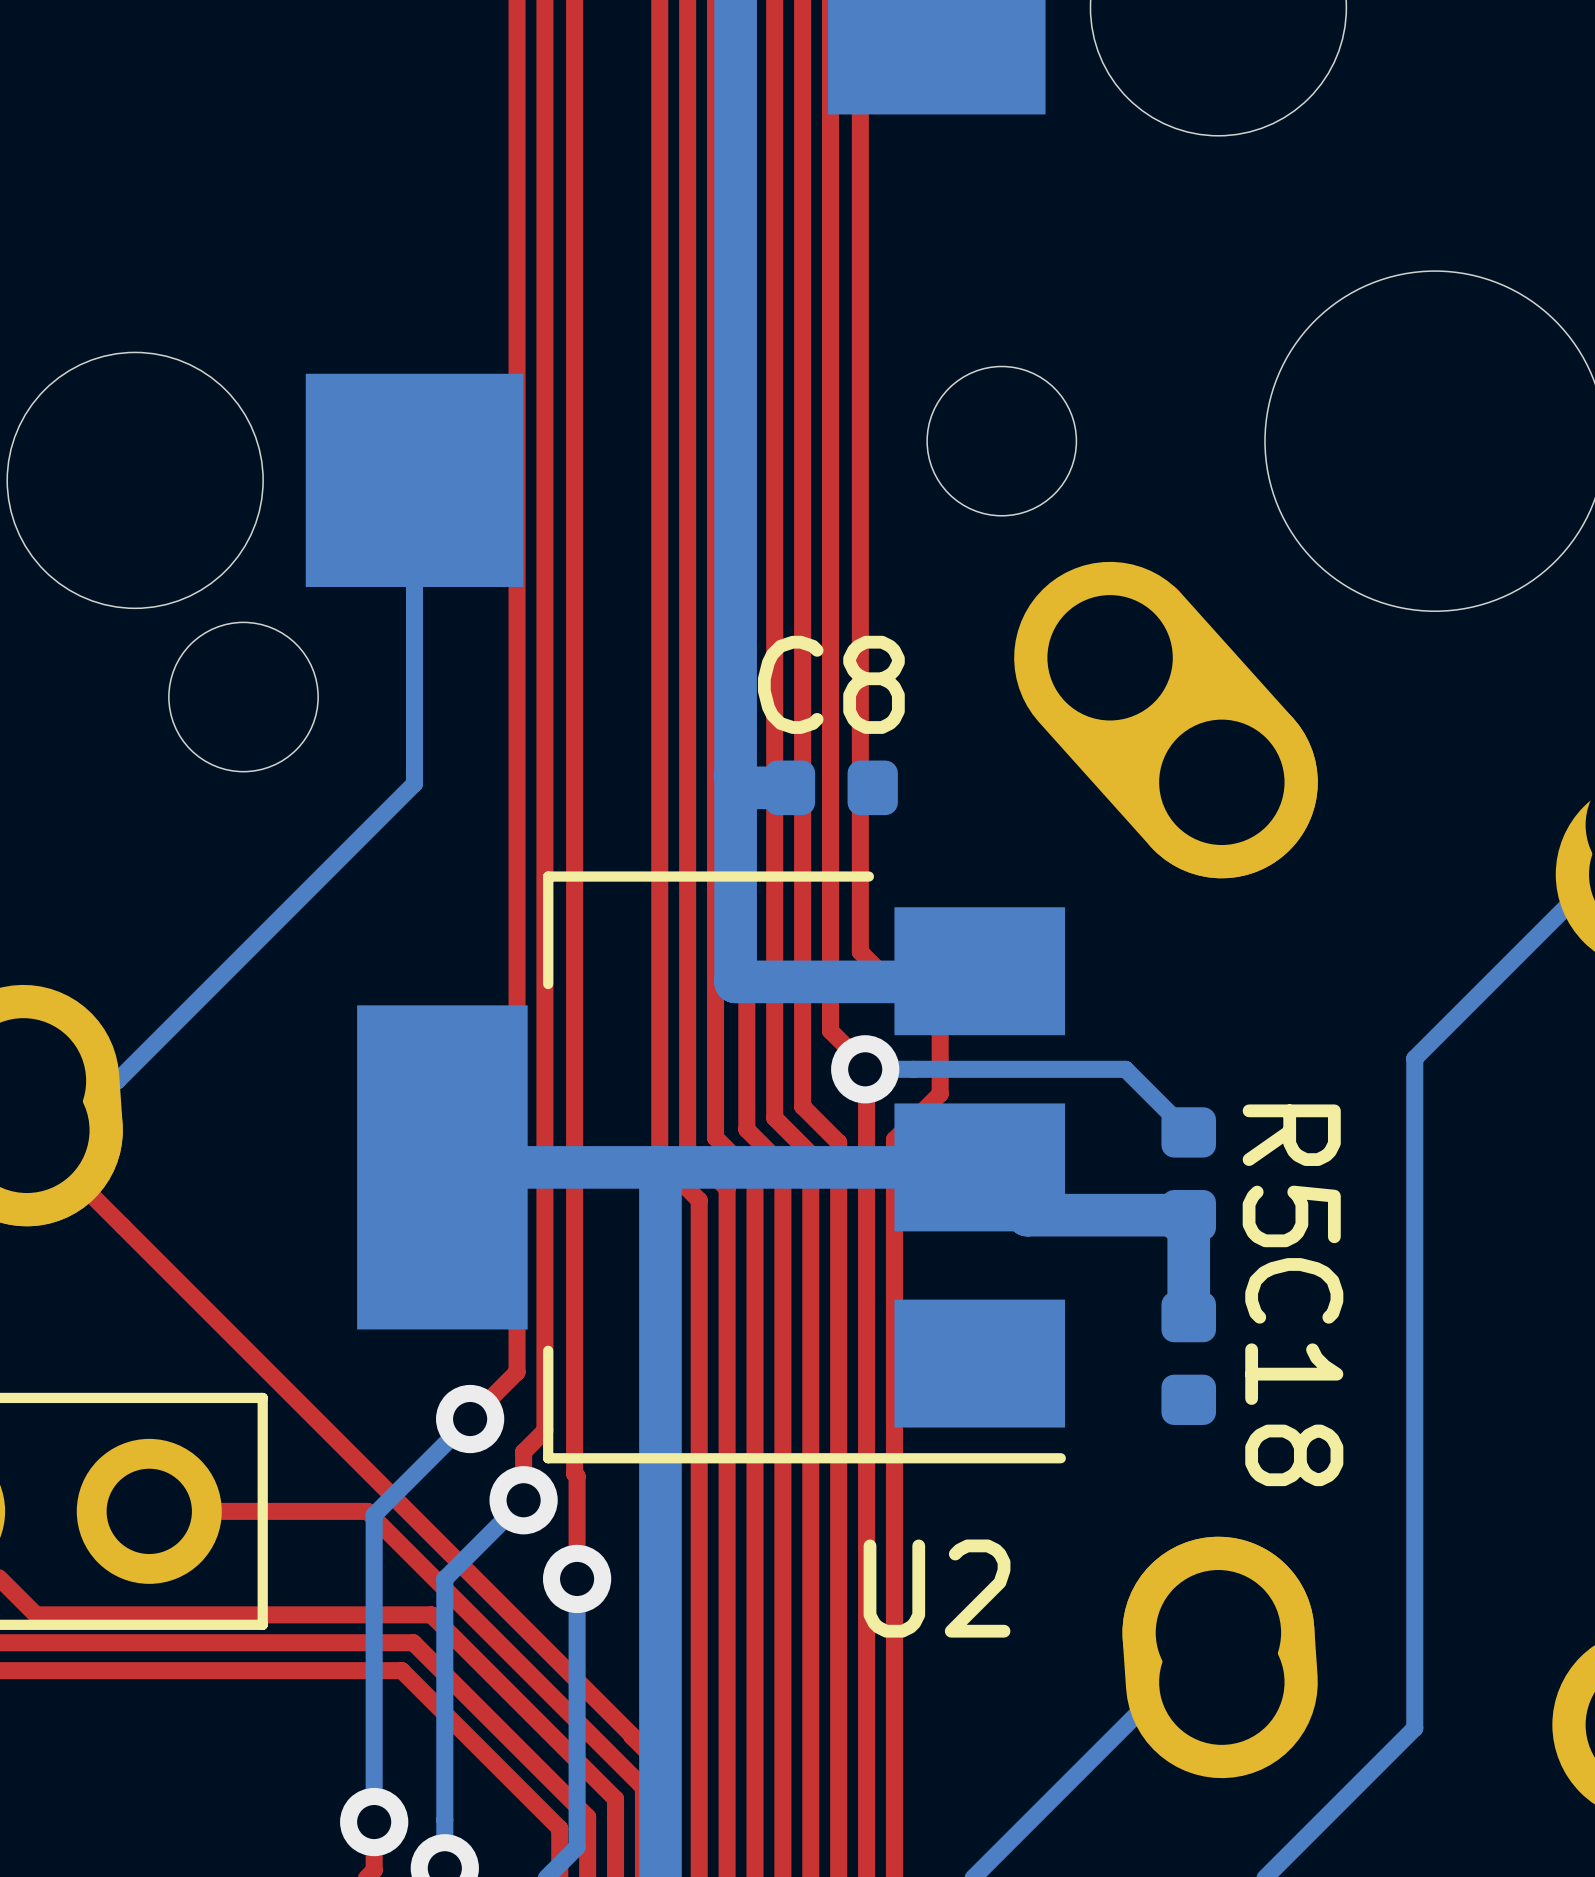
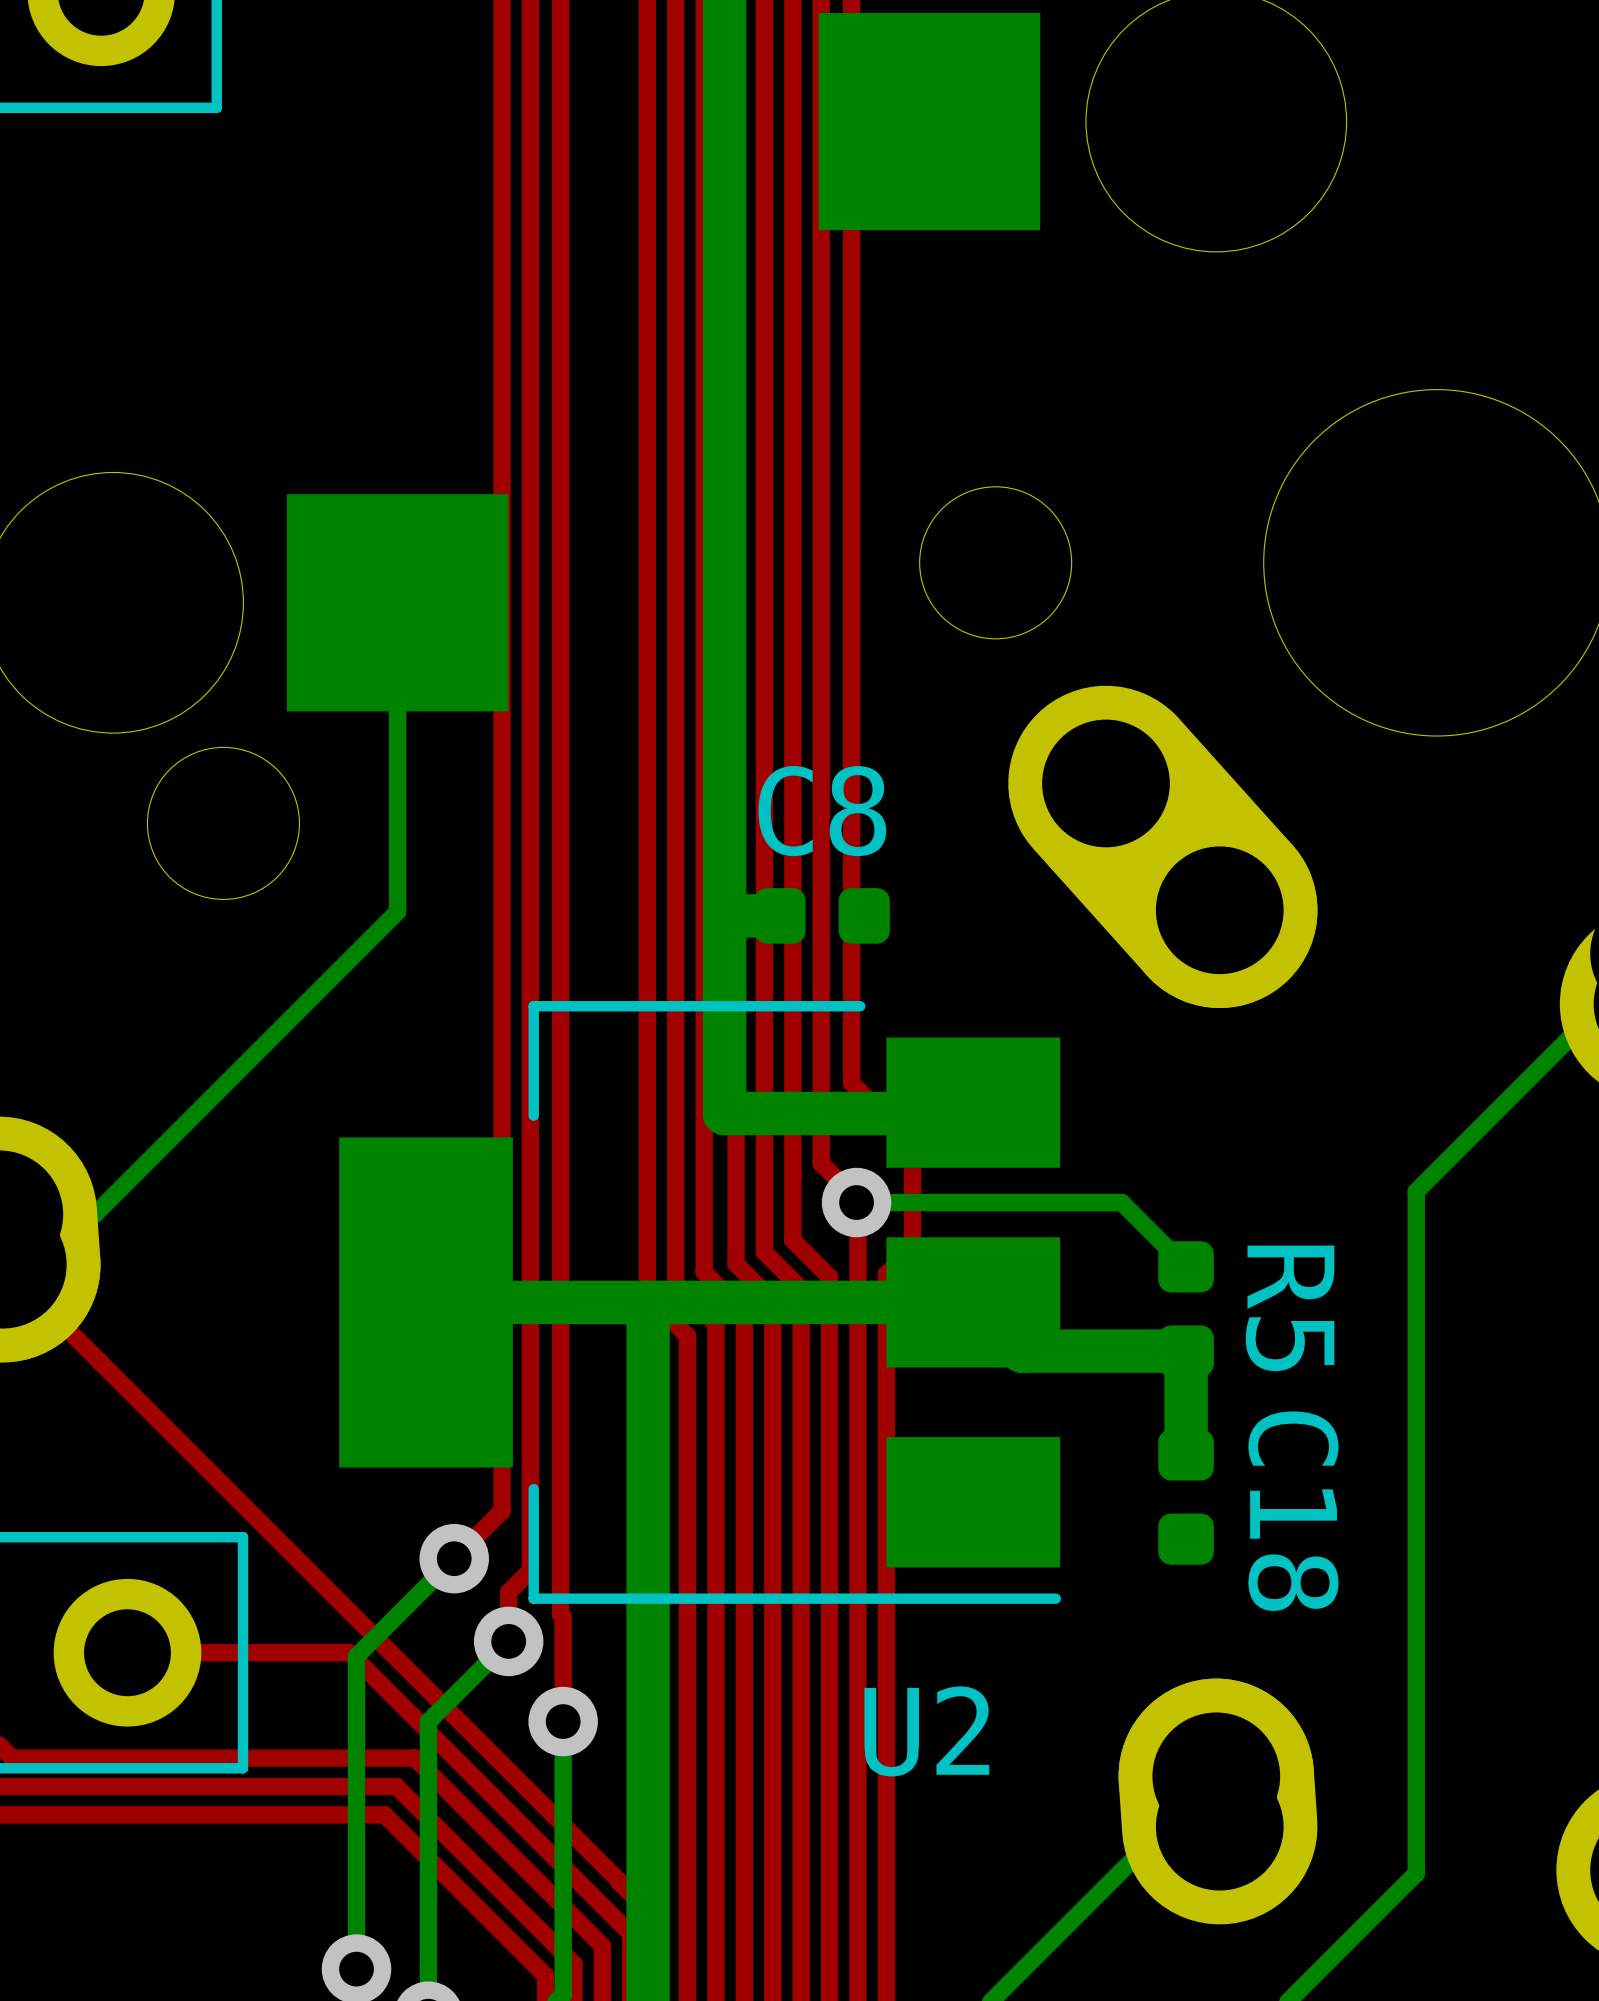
top track: (920, 1011) (940, 1031) (940, 1093) (920, 1114) -> (912, 1143) (912, 1248)

